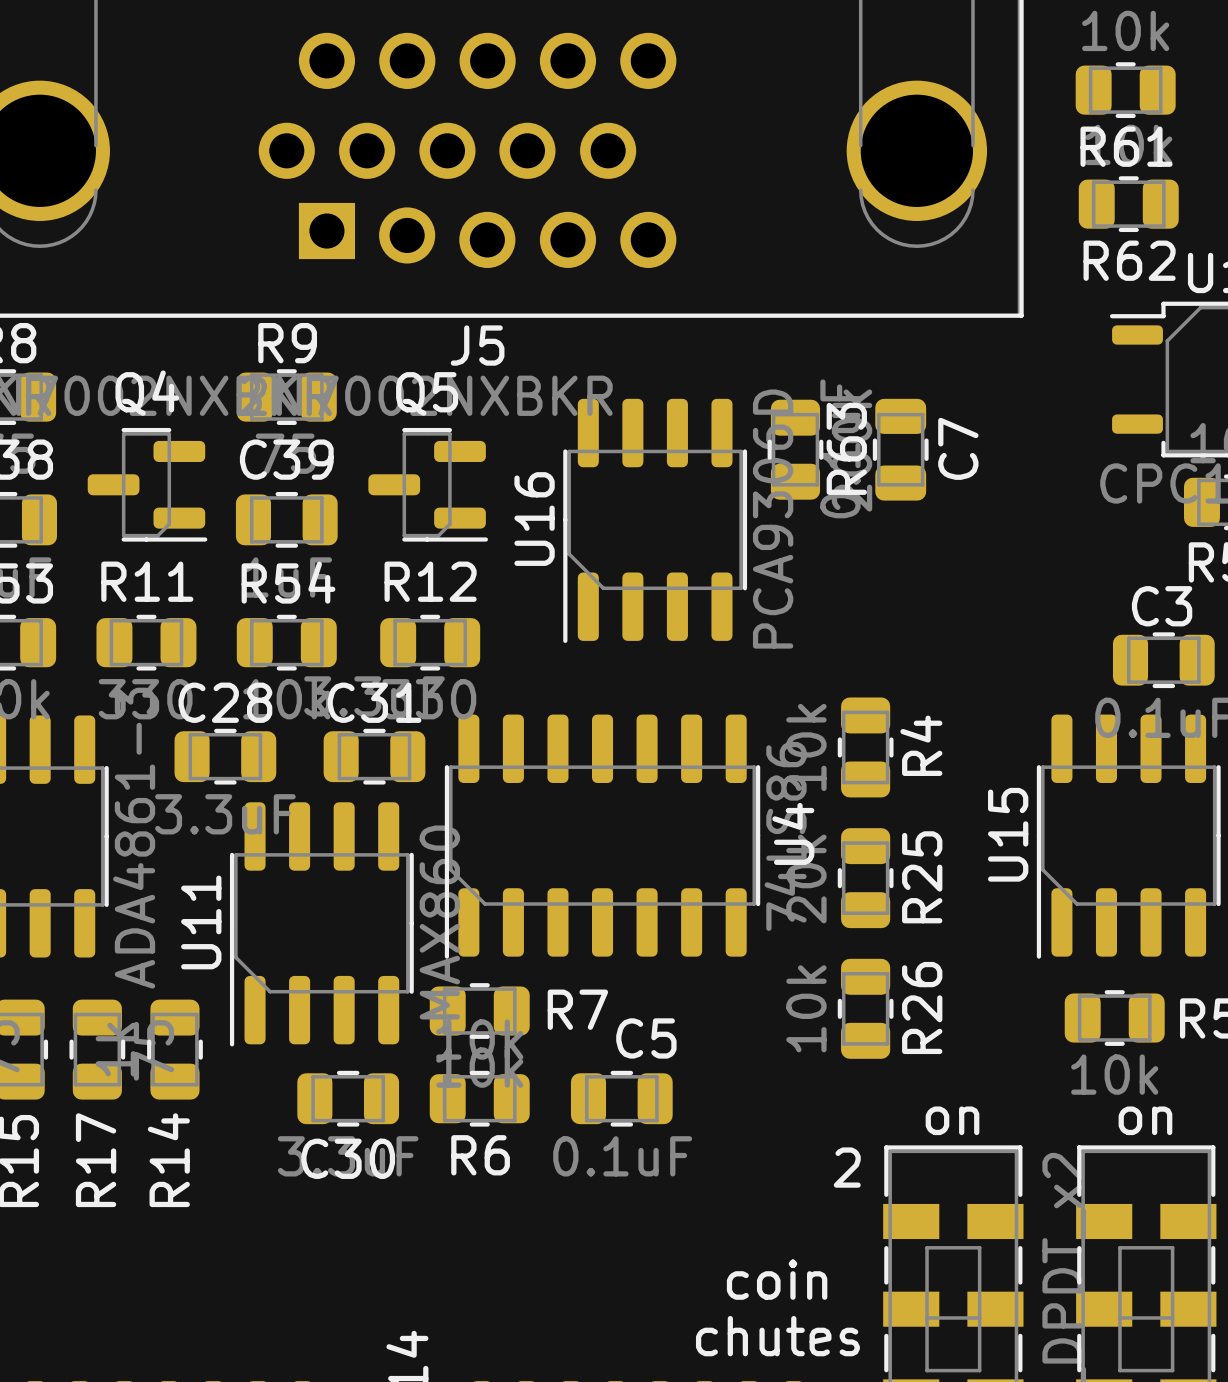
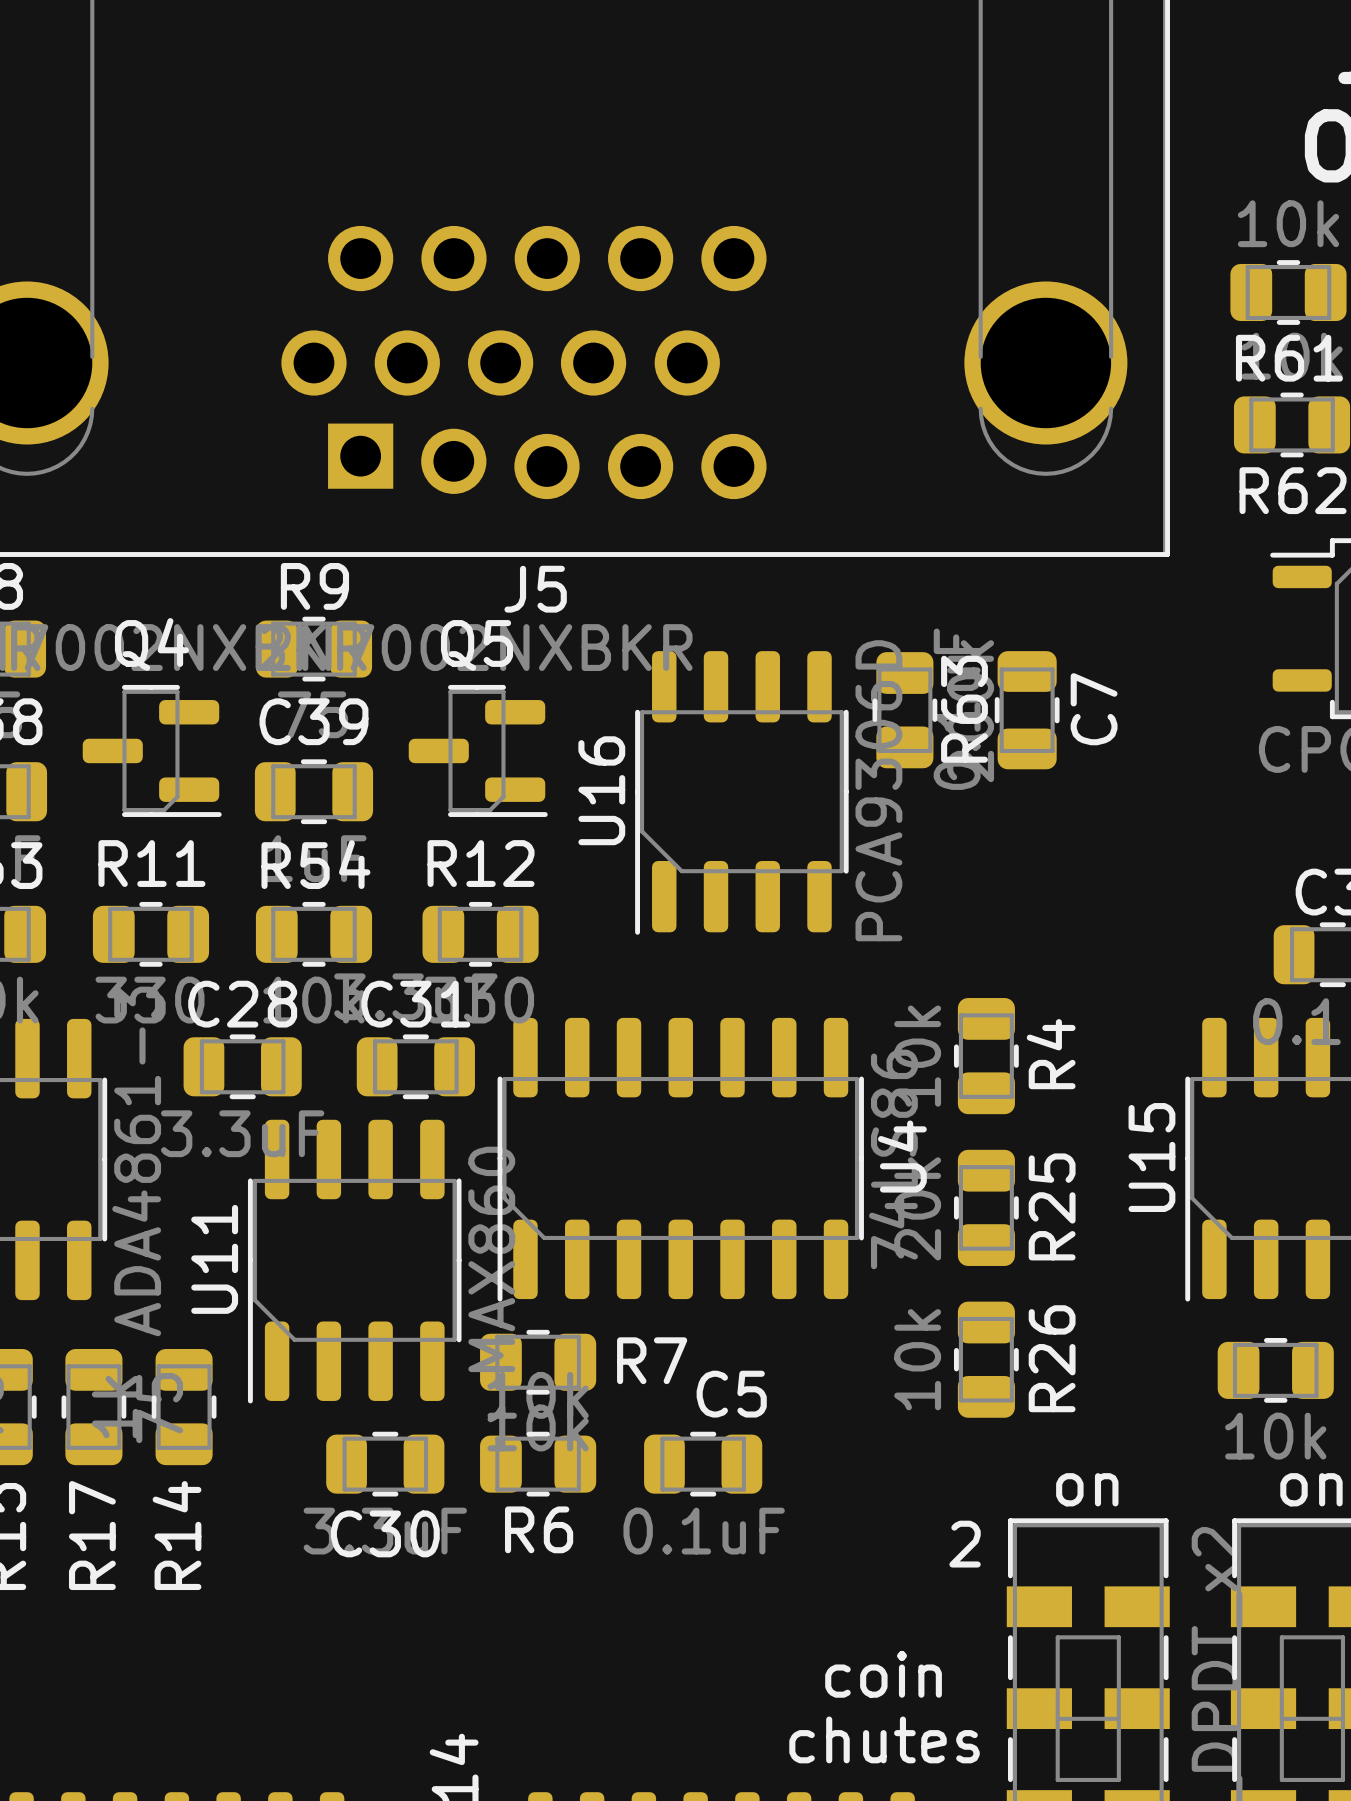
U16 footprint: [563, 398, 748, 644] -> [635, 651, 849, 935]

